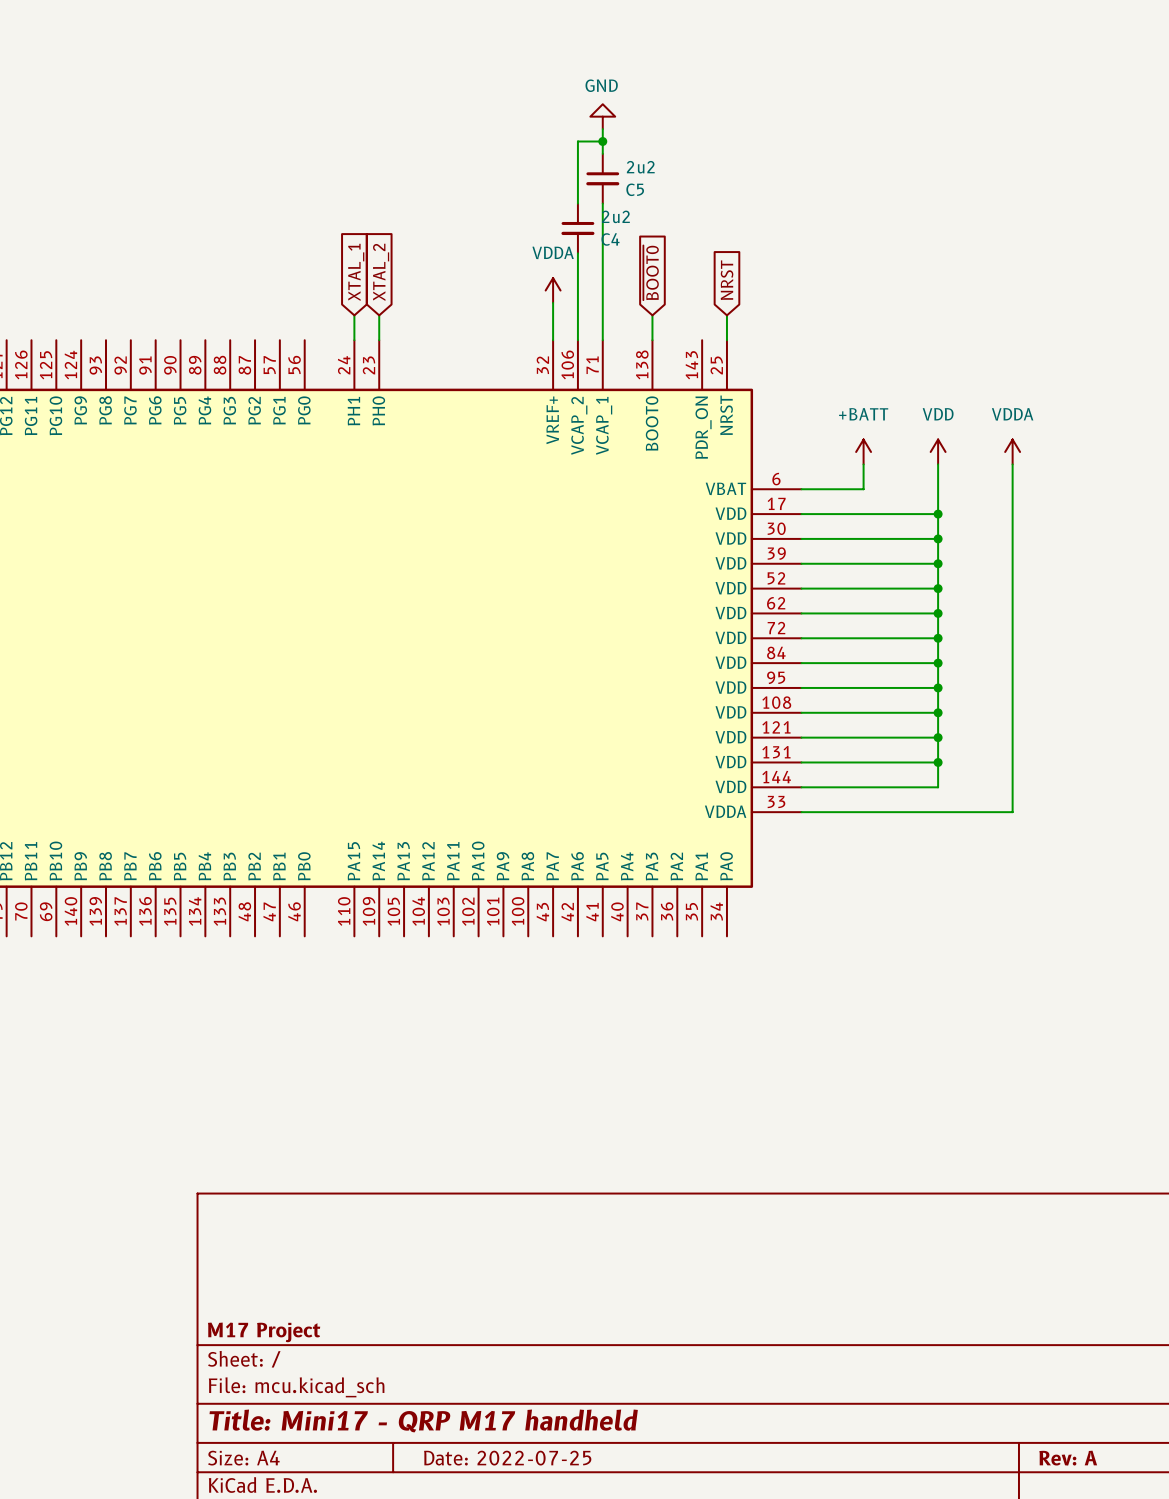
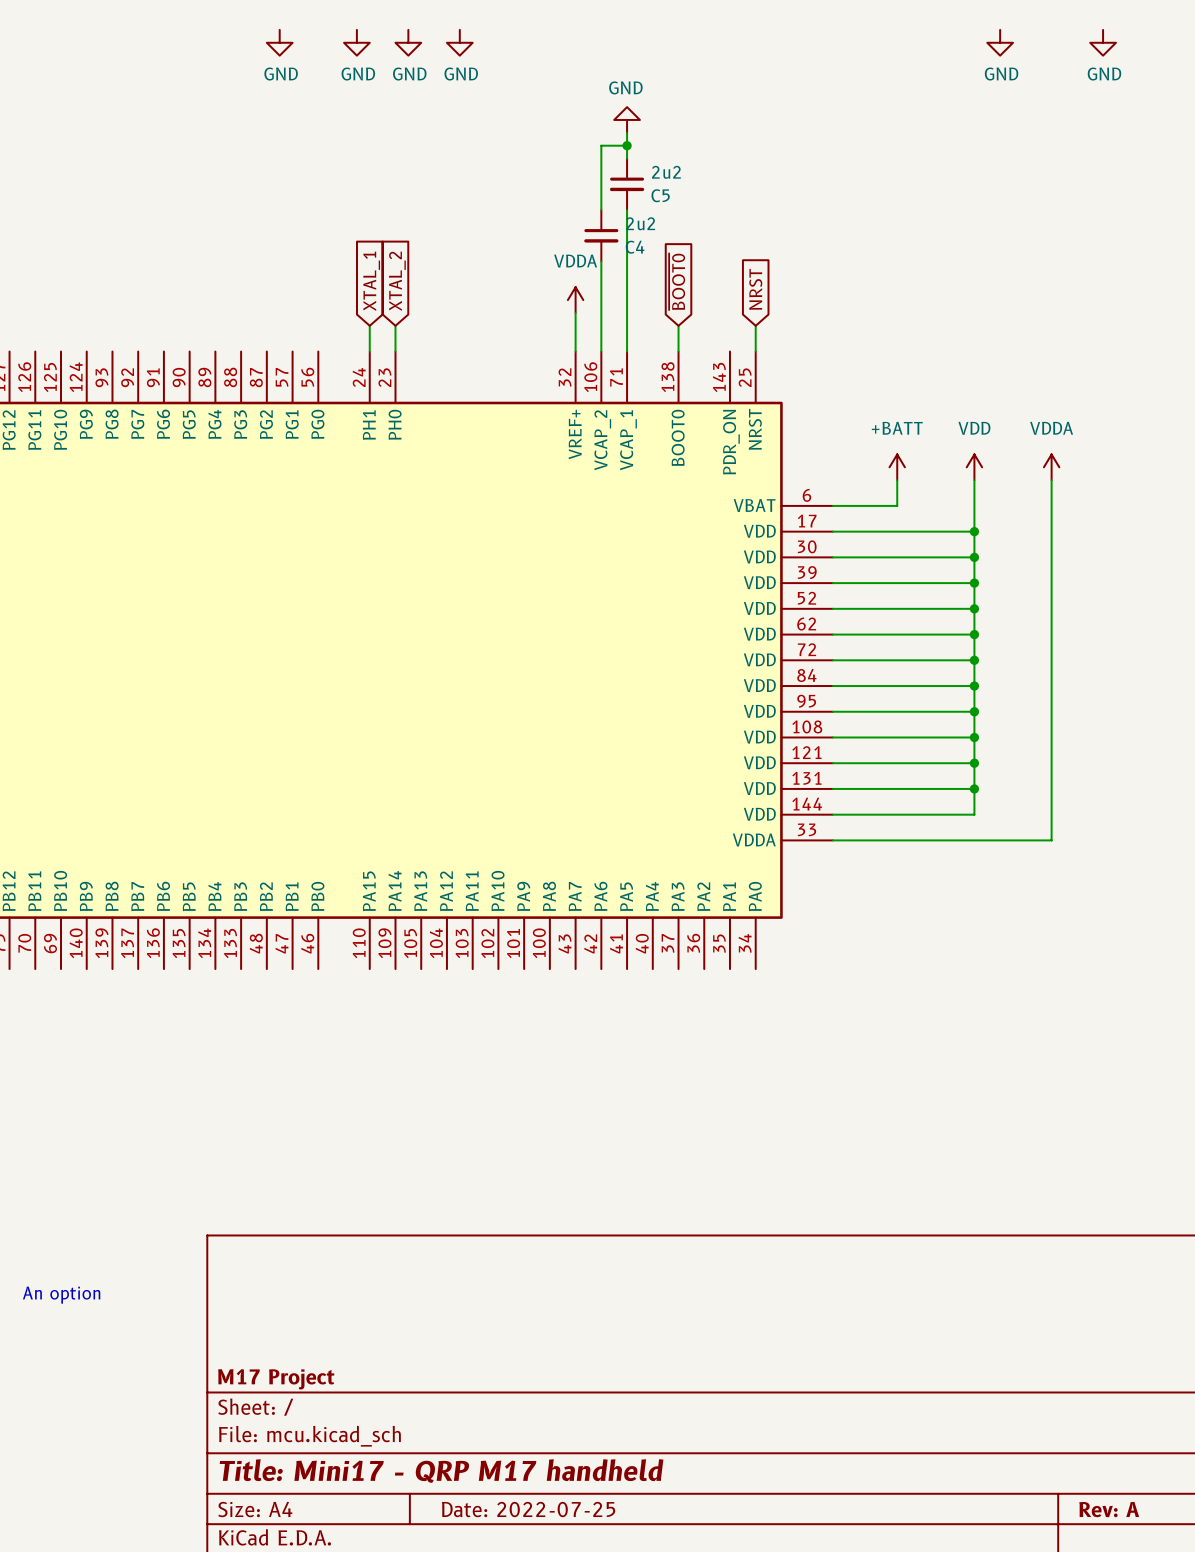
power symbol: none -> GND (279, 42)
power symbol: none -> GND (356, 42)
power symbol: none -> GND (408, 42)
power symbol: none -> GND (459, 42)
power symbol: none -> GND (1000, 42)
power symbol: none -> GND (1103, 42)
text: none -> An option (61, 1295)

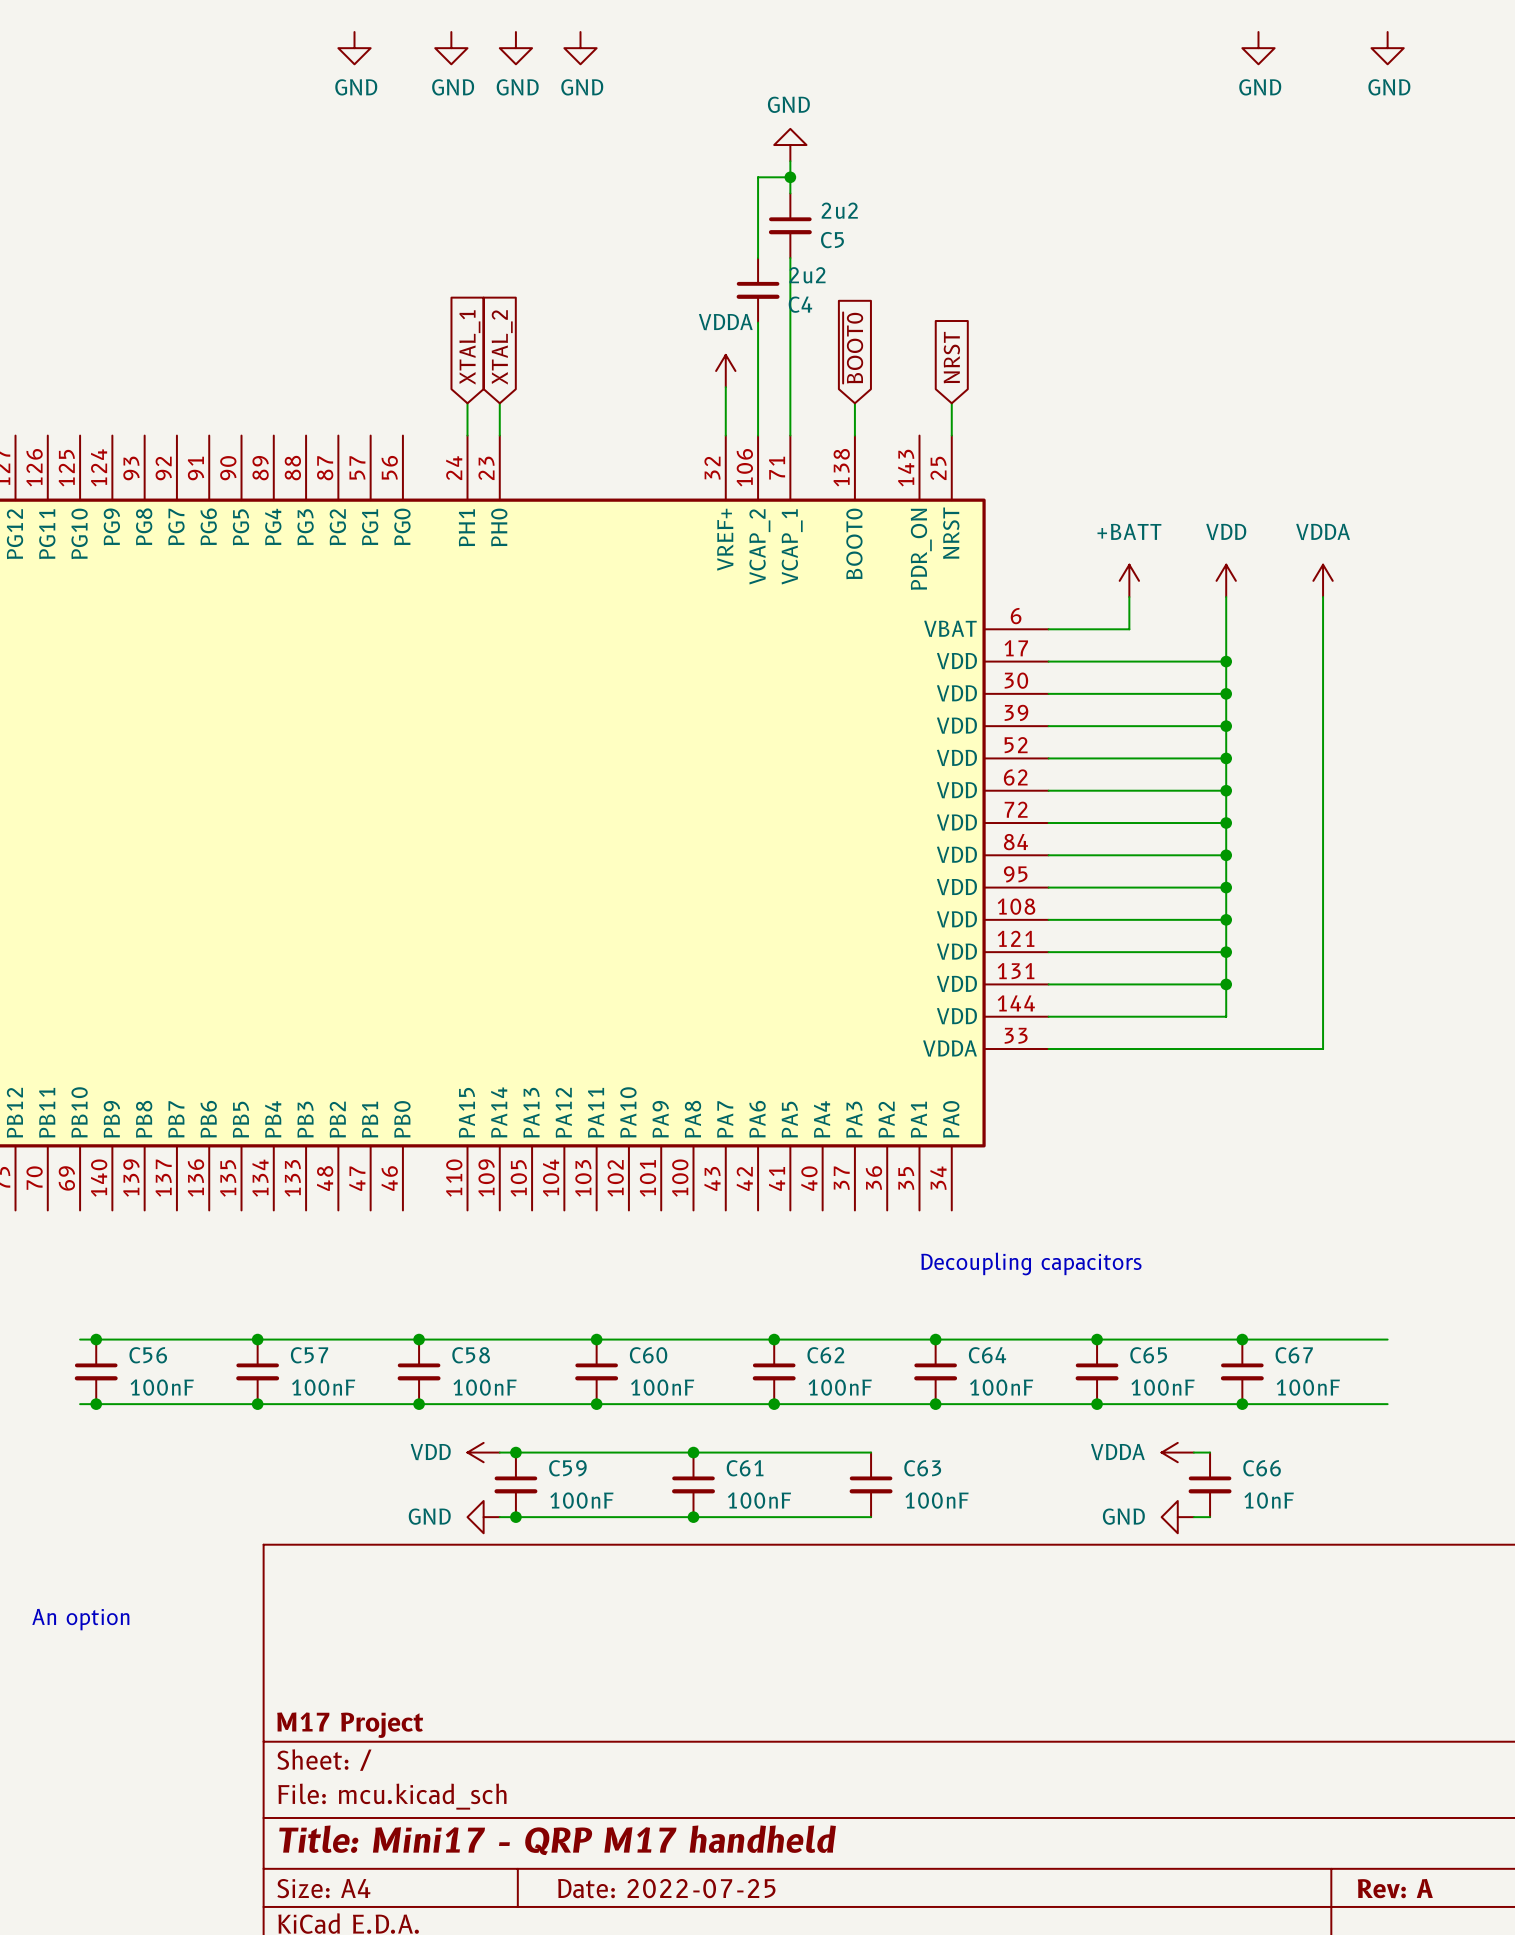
text: none -> Decoupling capacitors (1031, 1263)
wire: none -> (80, 1339) (1387, 1339)
junction: none -> (96, 1339)
junction: none -> (257, 1339)
junction: none -> (419, 1339)
junction: none -> (596, 1339)
junction: none -> (774, 1339)
junction: none -> (935, 1339)
junction: none -> (1097, 1339)
junction: none -> (1242, 1339)
C56: none -> 100nF (96, 1371)
C57: none -> 100nF (257, 1371)
C58: none -> 100nF (419, 1371)
C60: none -> 100nF (596, 1371)
C62: none -> 100nF (774, 1371)
C64: none -> 100nF (935, 1371)
C65: none -> 100nF (1097, 1371)
C67: none -> 100nF (1242, 1371)
wire: none -> (80, 1404) (1387, 1404)
junction: none -> (96, 1404)
junction: none -> (257, 1404)
junction: none -> (419, 1404)
junction: none -> (596, 1404)
junction: none -> (774, 1404)
junction: none -> (935, 1404)
junction: none -> (1097, 1404)
junction: none -> (1242, 1404)
power symbol: none -> VDD (483, 1452)
wire: none -> (499, 1452) (871, 1452)
junction: none -> (515, 1452)
junction: none -> (693, 1452)
power symbol: none -> VDDA (1177, 1452)
wire: none -> (1193, 1452) (1210, 1452)
C59: none -> 100nF (515, 1484)
C61: none -> 100nF (693, 1484)
C63: none -> 100nF (871, 1484)
C66: none -> 10nF (1210, 1484)
power symbol: none -> GND (483, 1517)
wire: none -> (499, 1517) (871, 1517)
junction: none -> (515, 1517)
junction: none -> (693, 1517)
power symbol: none -> GND (1177, 1517)
wire: none -> (1193, 1517) (1210, 1517)

